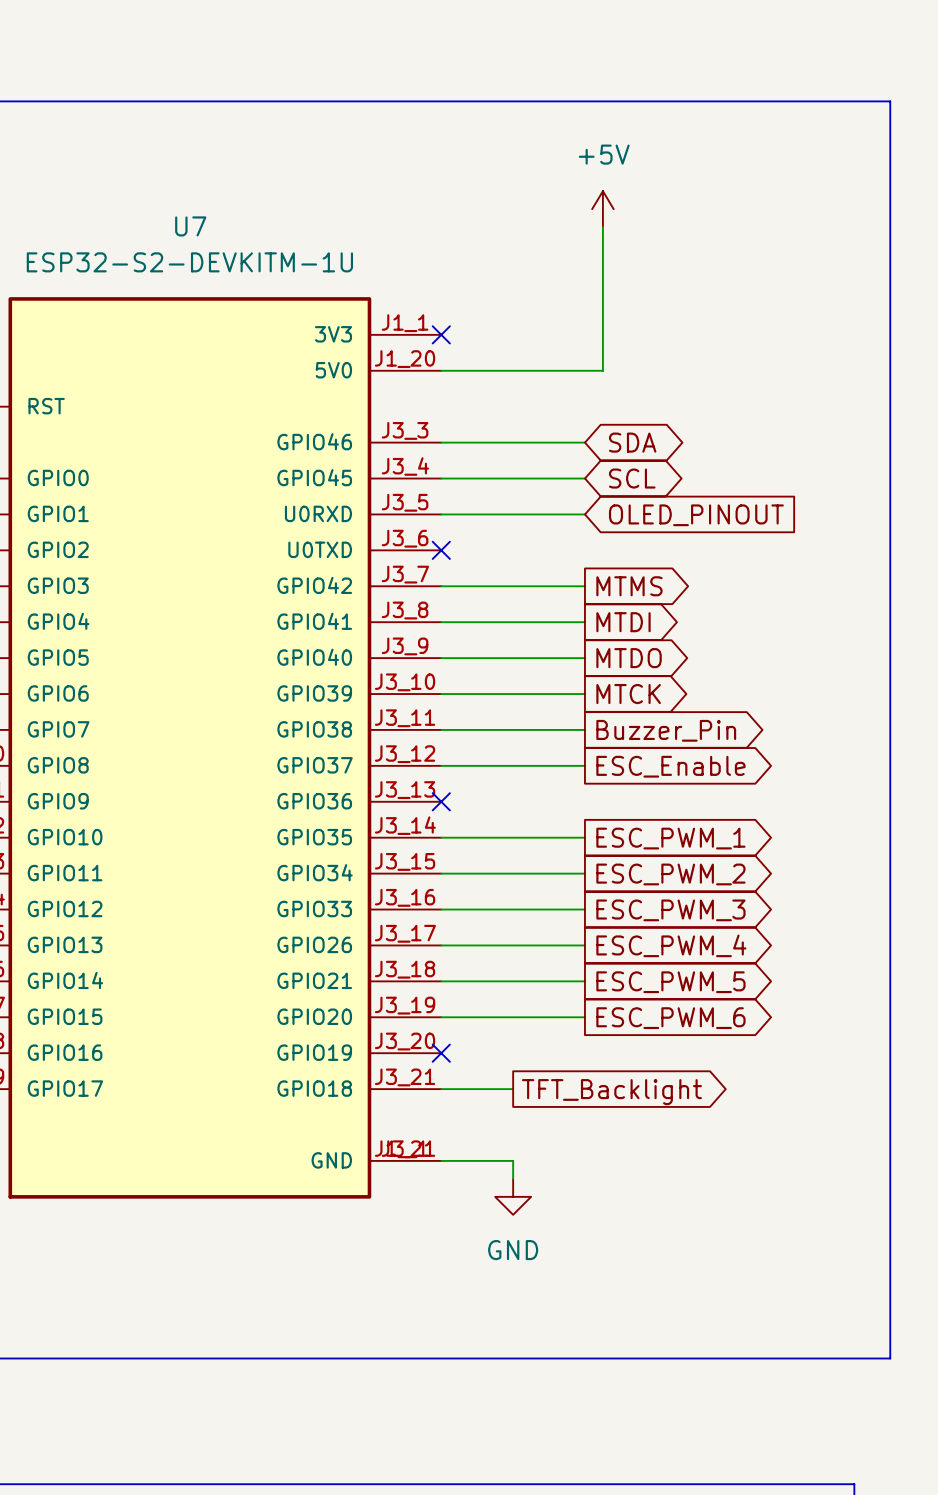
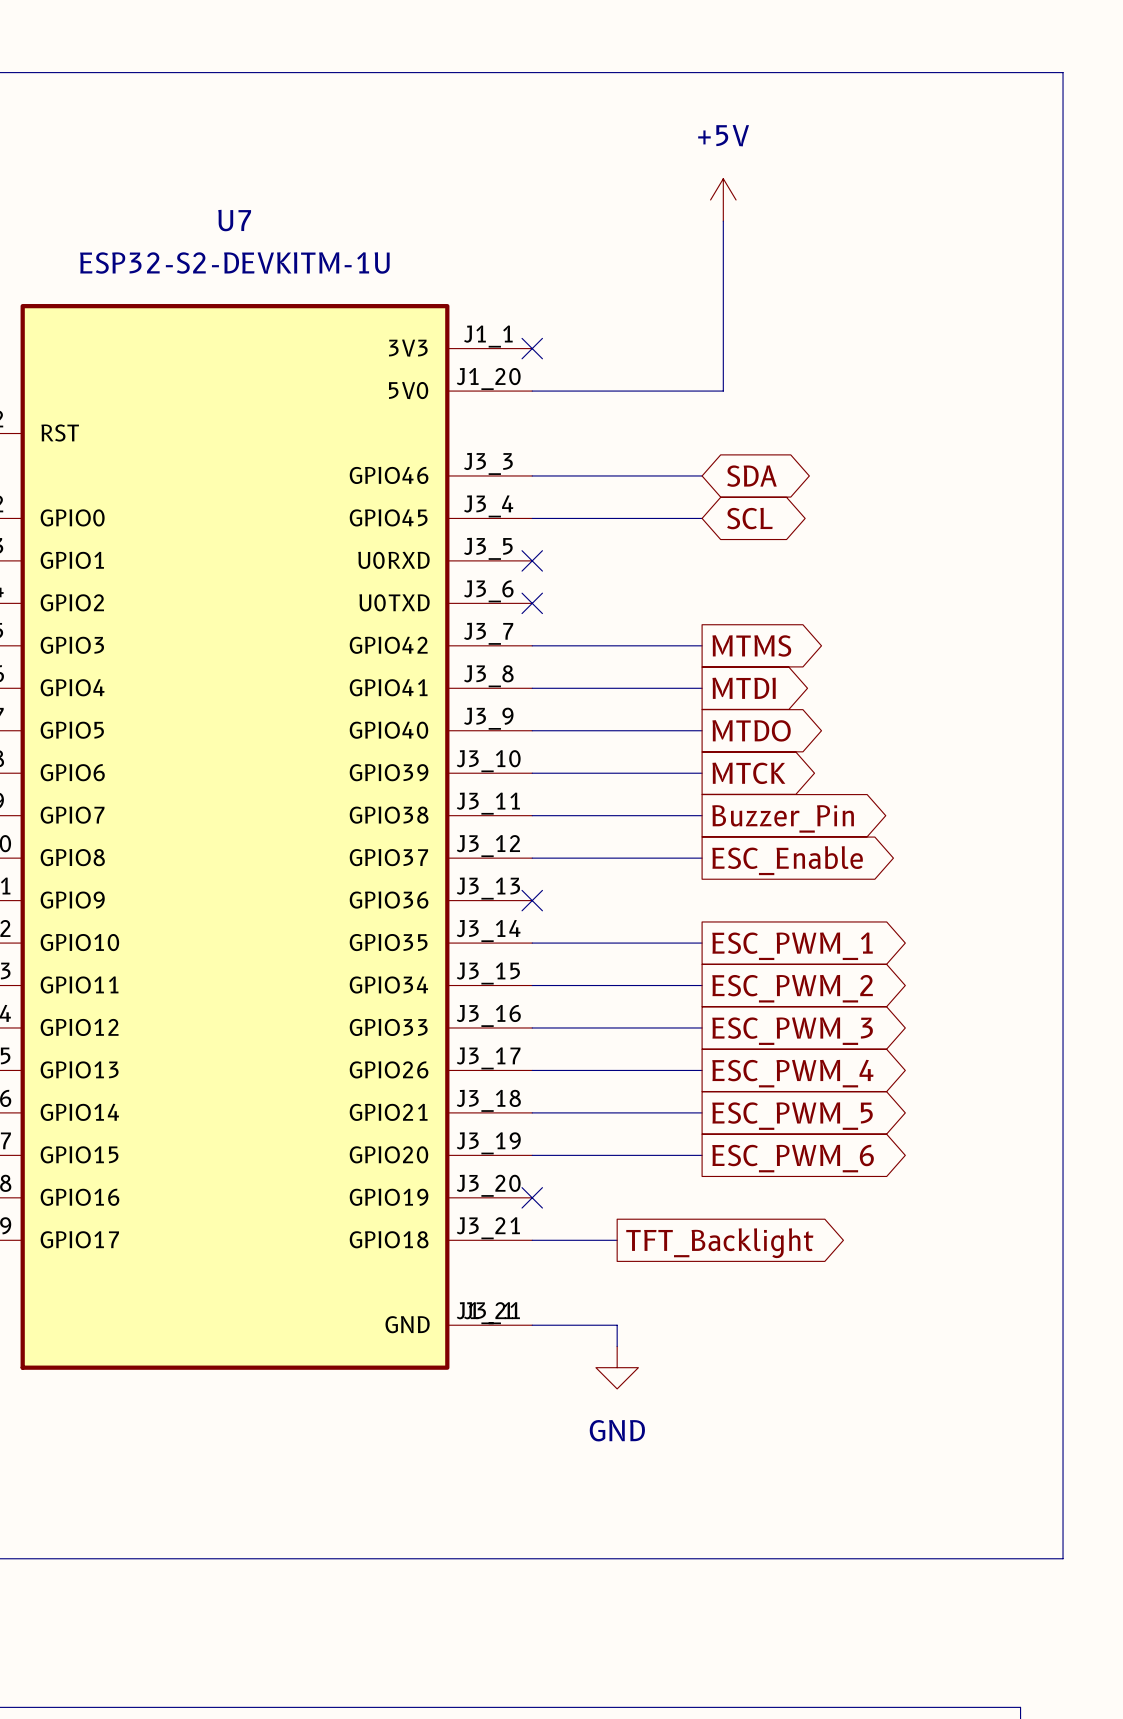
wire: (441, 514) (584, 514) -> none
no-connect mark: none -> (532, 560)
global label: OLED_PINOUT (696, 515) -> none

